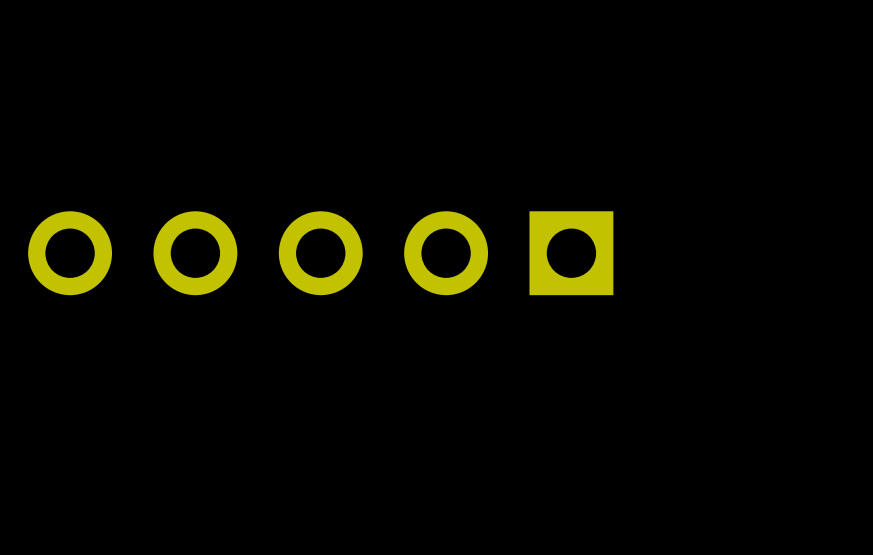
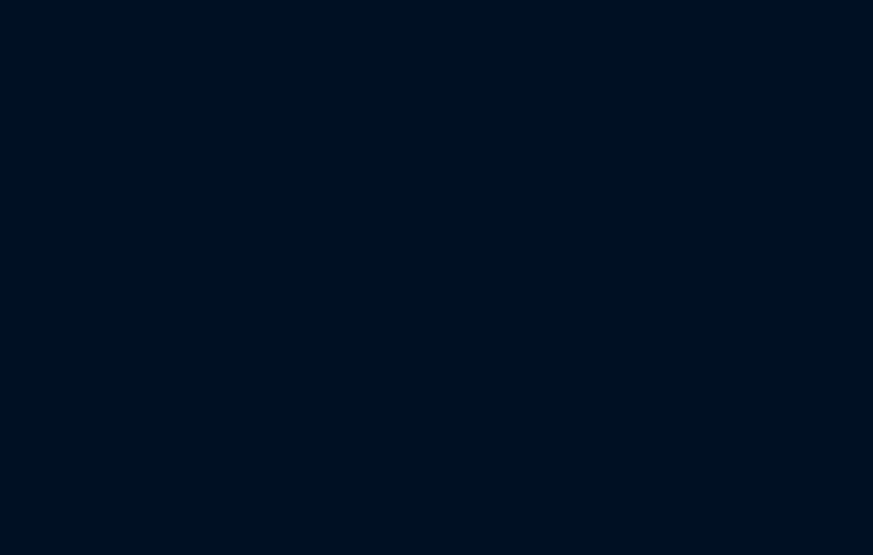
part: (320, 253) -> none

